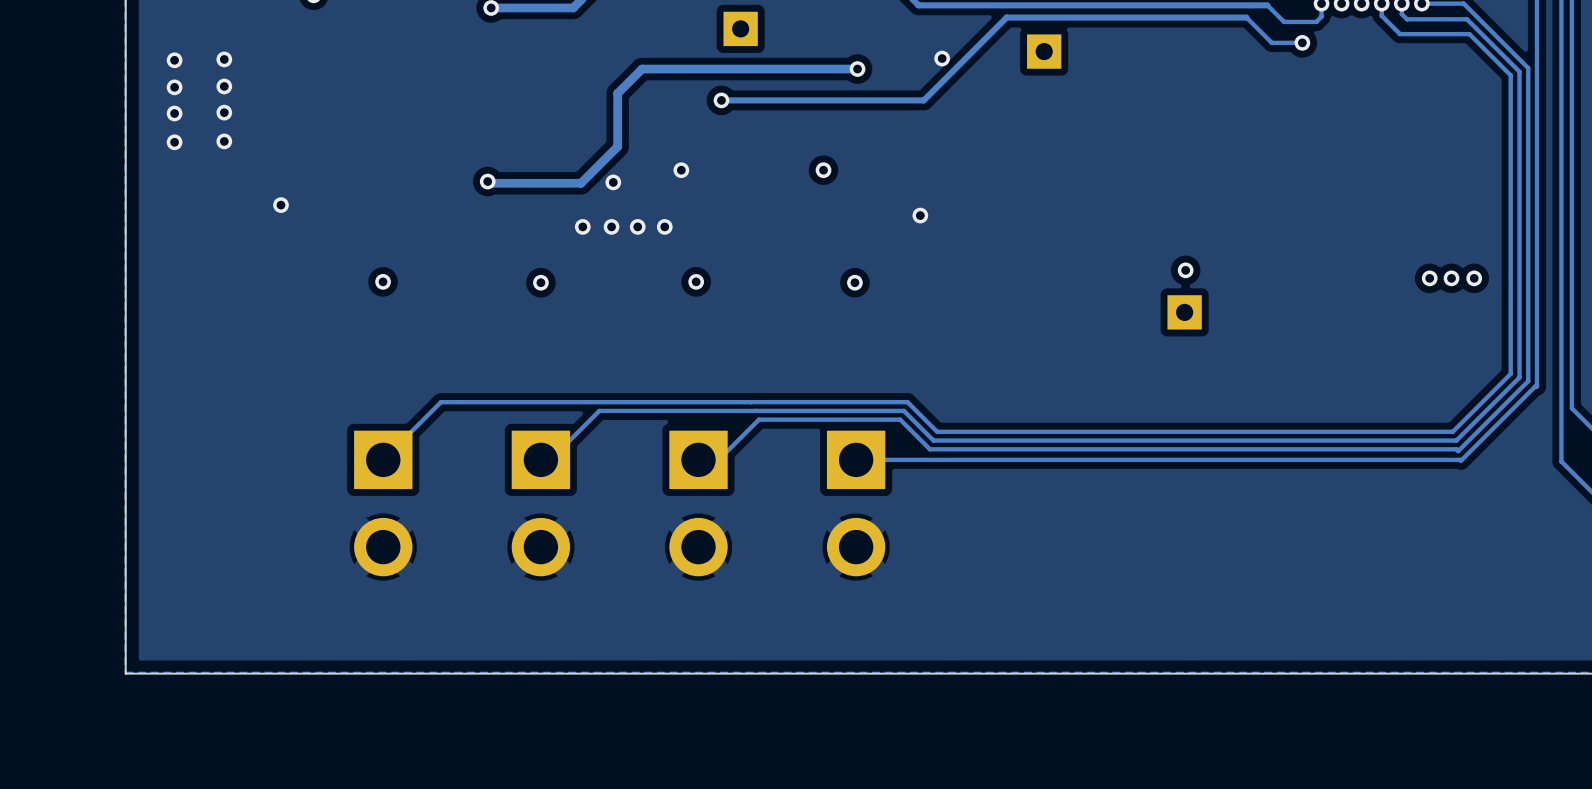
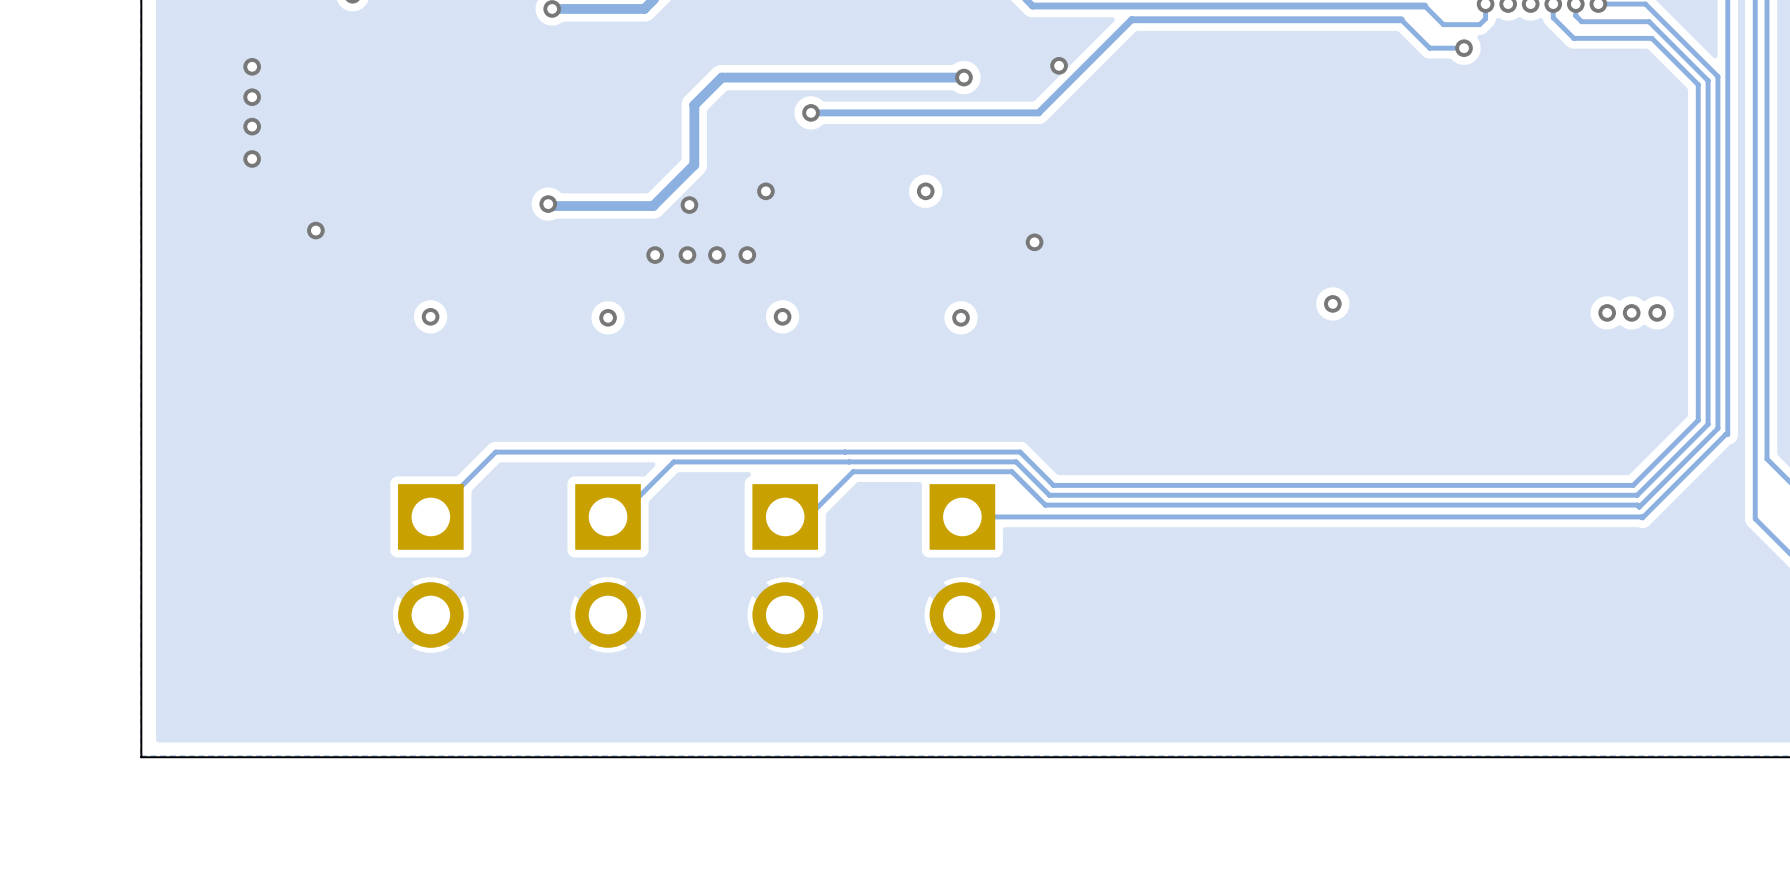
part: (740, 28) -> none
part: (1044, 51) -> none
via: (174, 60) -> none
via: (174, 87) -> none
via: (174, 113) -> none
via: (174, 142) -> none
part: (1184, 312) -> none

